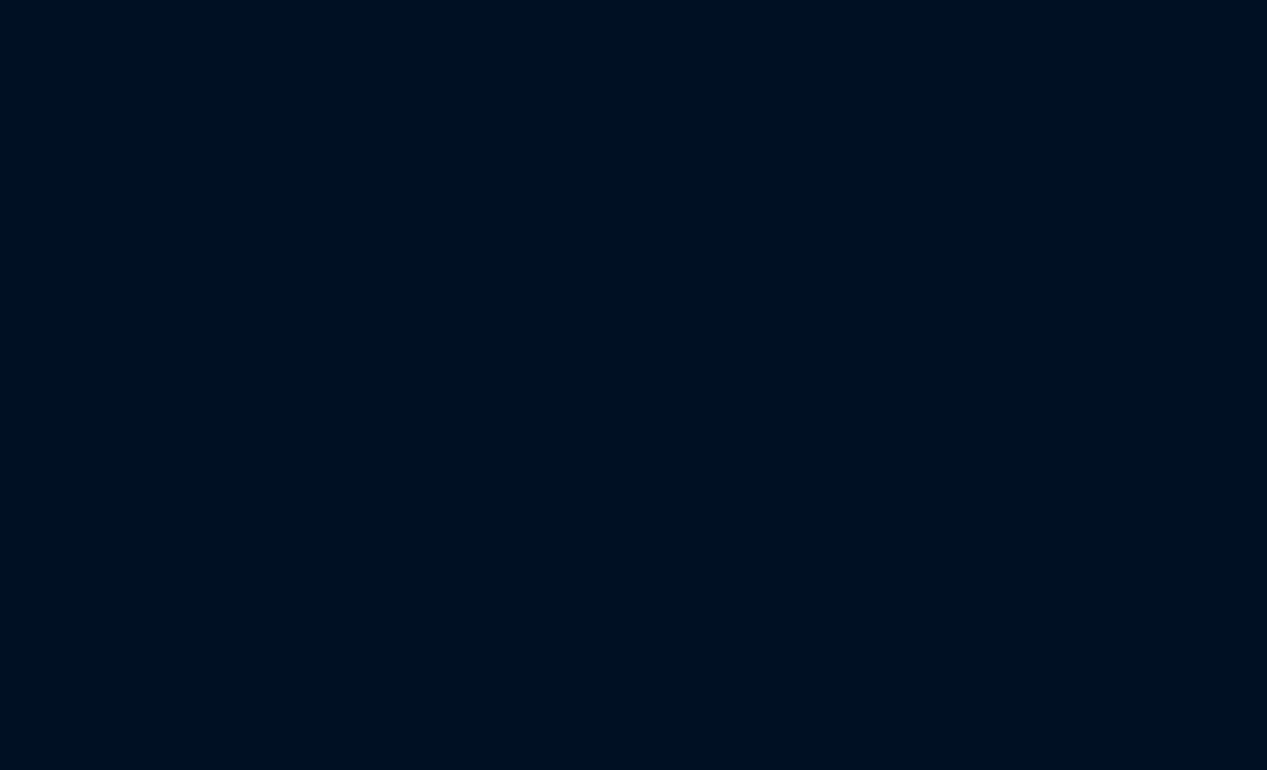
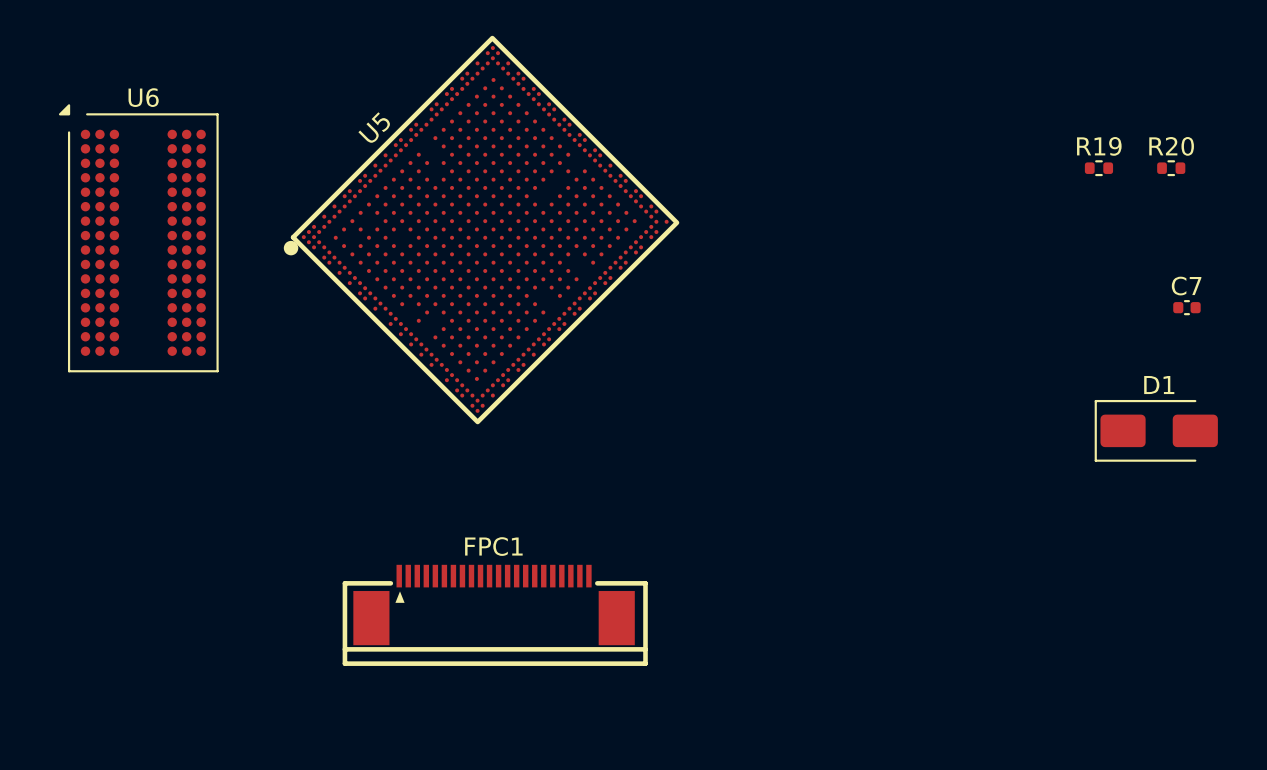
R19: none -> (1098, 168)
R20: none -> (1171, 168)
U5: none -> (481, 230)
U6: none -> (138, 238)
C7: none -> (1186, 307)
D1: none -> (1156, 430)
FPC1: none -> (495, 615)

